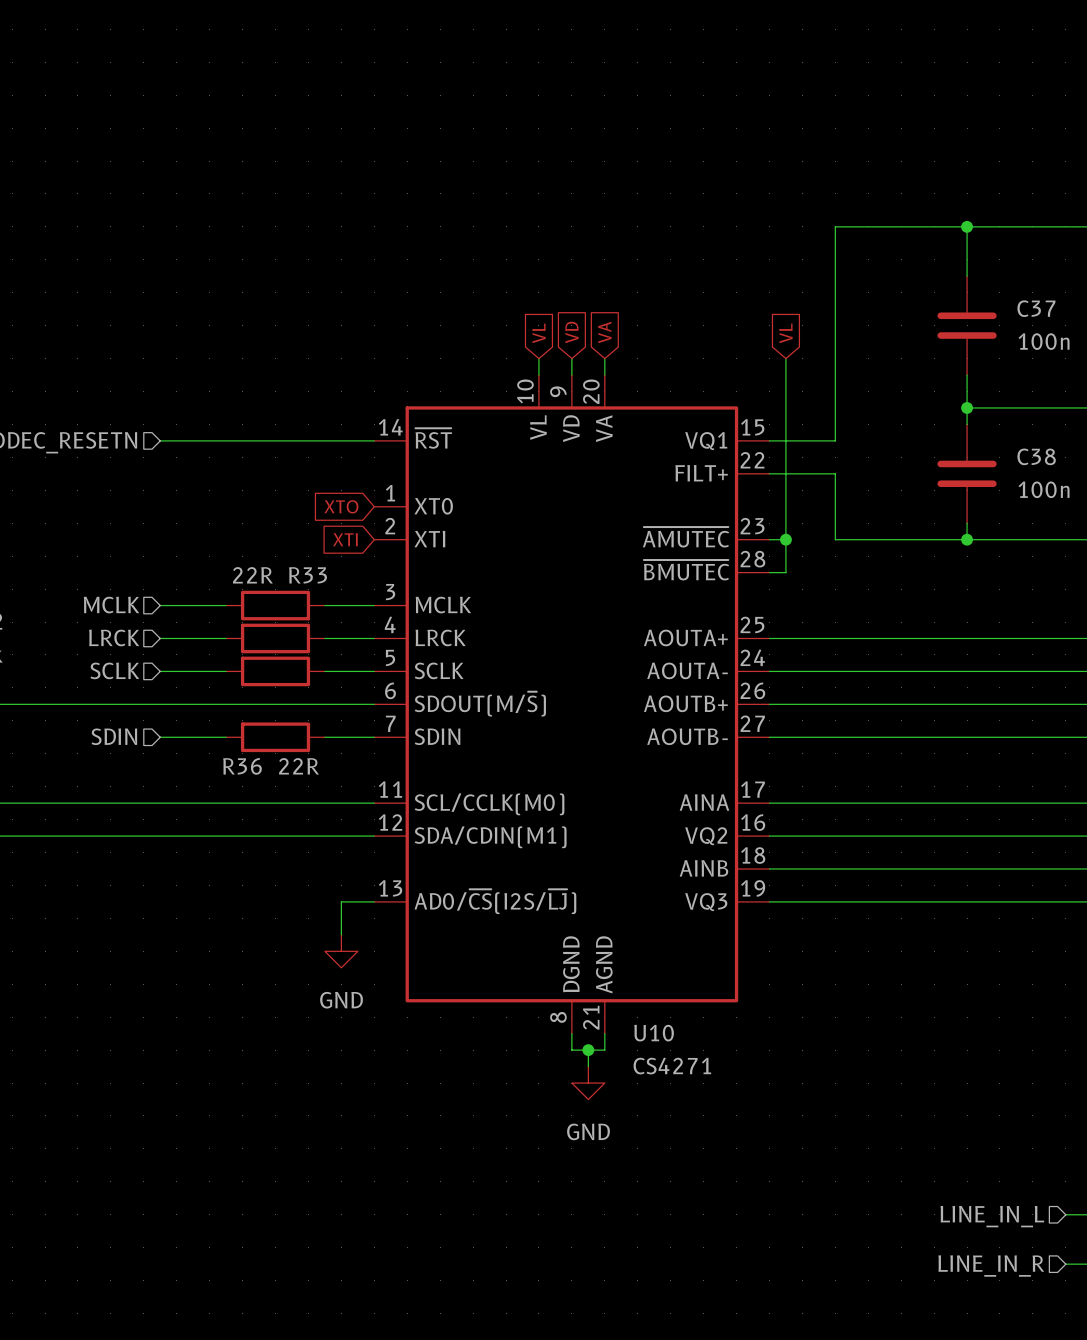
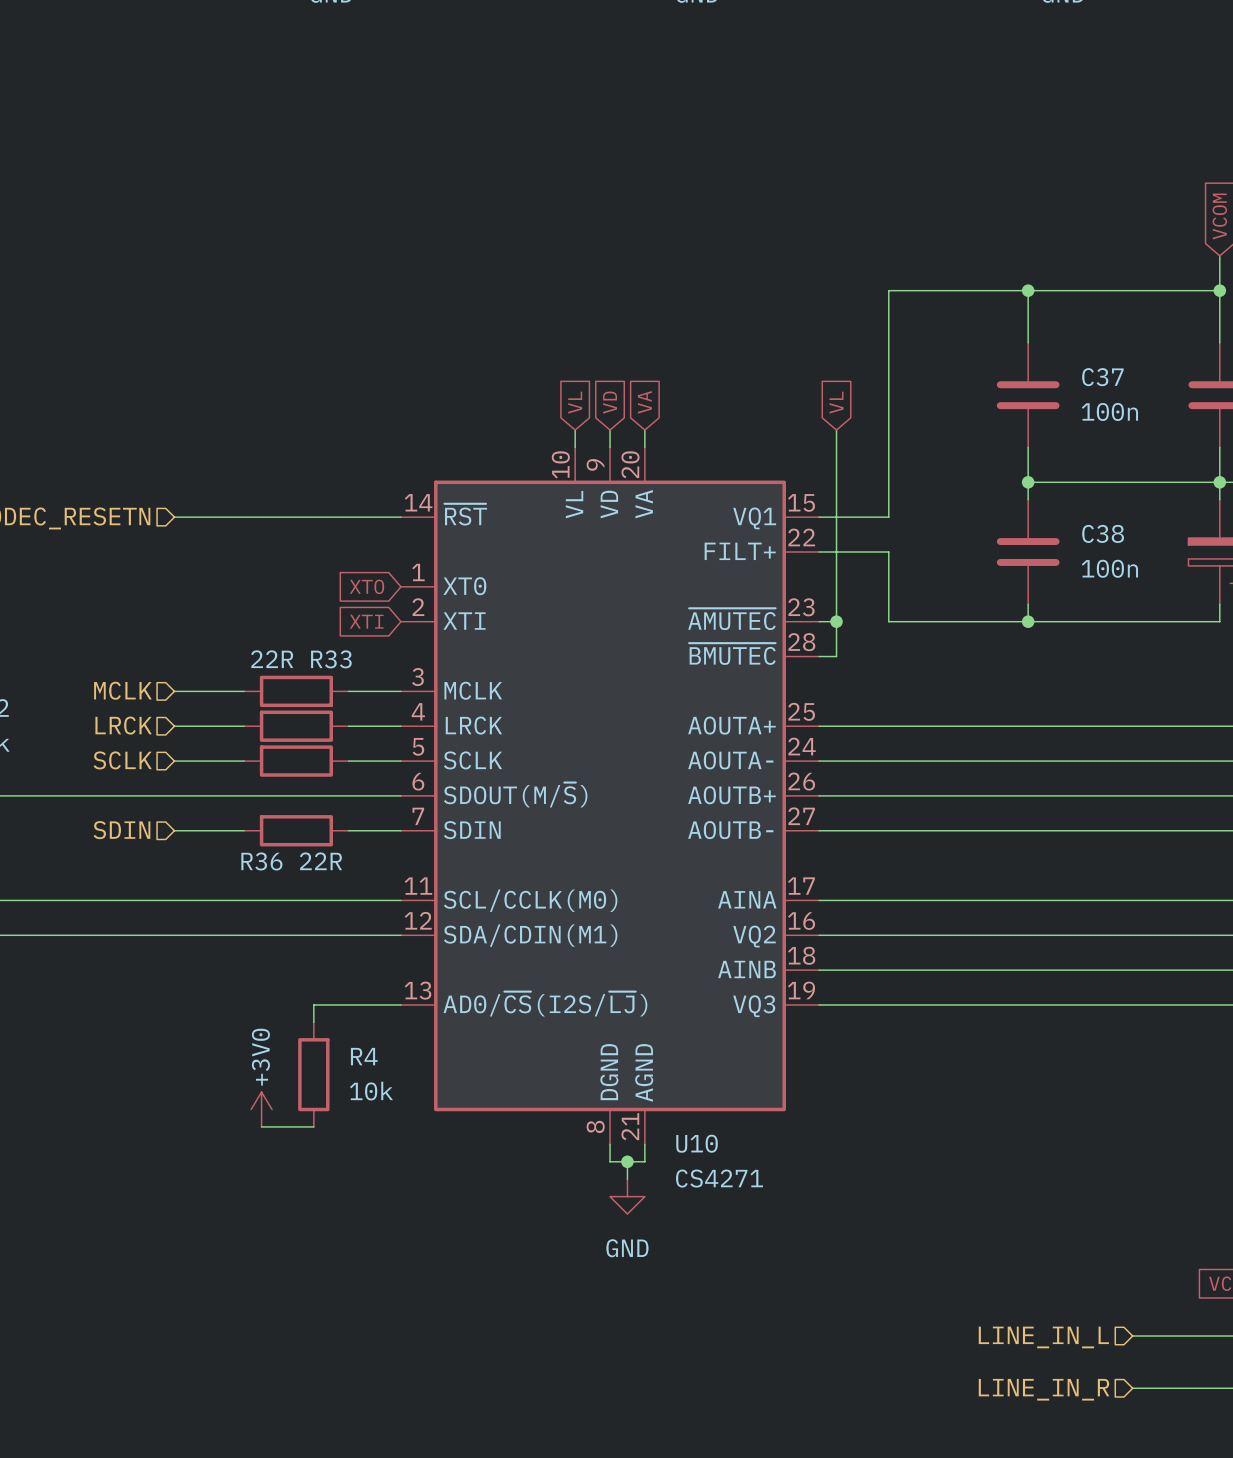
wire: (341, 901) (341, 934) -> (366, 1004) (313, 1004) (313, 1022)
power symbol: GND (341, 951) -> none
R4: none -> 10k (313, 1074)
power symbol: none -> +3V0 (261, 1109)
wire: none -> (261, 1126) (313, 1126)

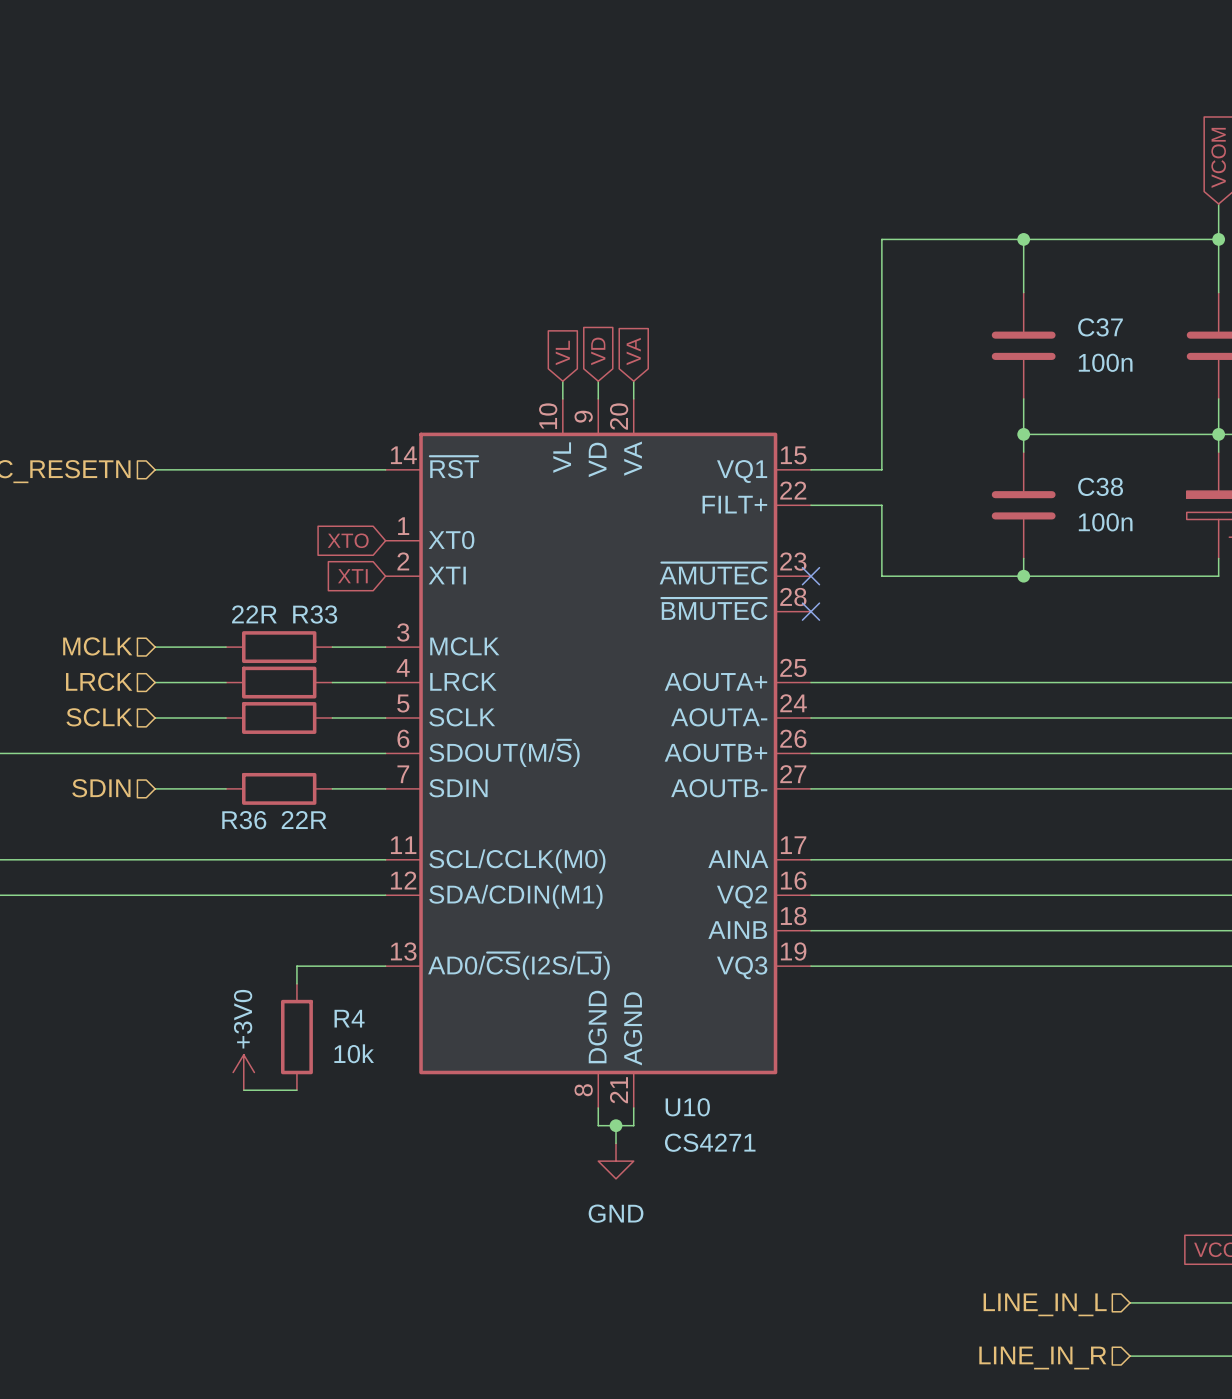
global label: VL (836, 402) -> none
wire: (836, 430) (836, 656) (819, 656) -> none
wire: (819, 621) (836, 621) -> none
no-connect mark: none -> (810, 576)
junction: (836, 621) -> none
no-connect mark: none -> (810, 611)

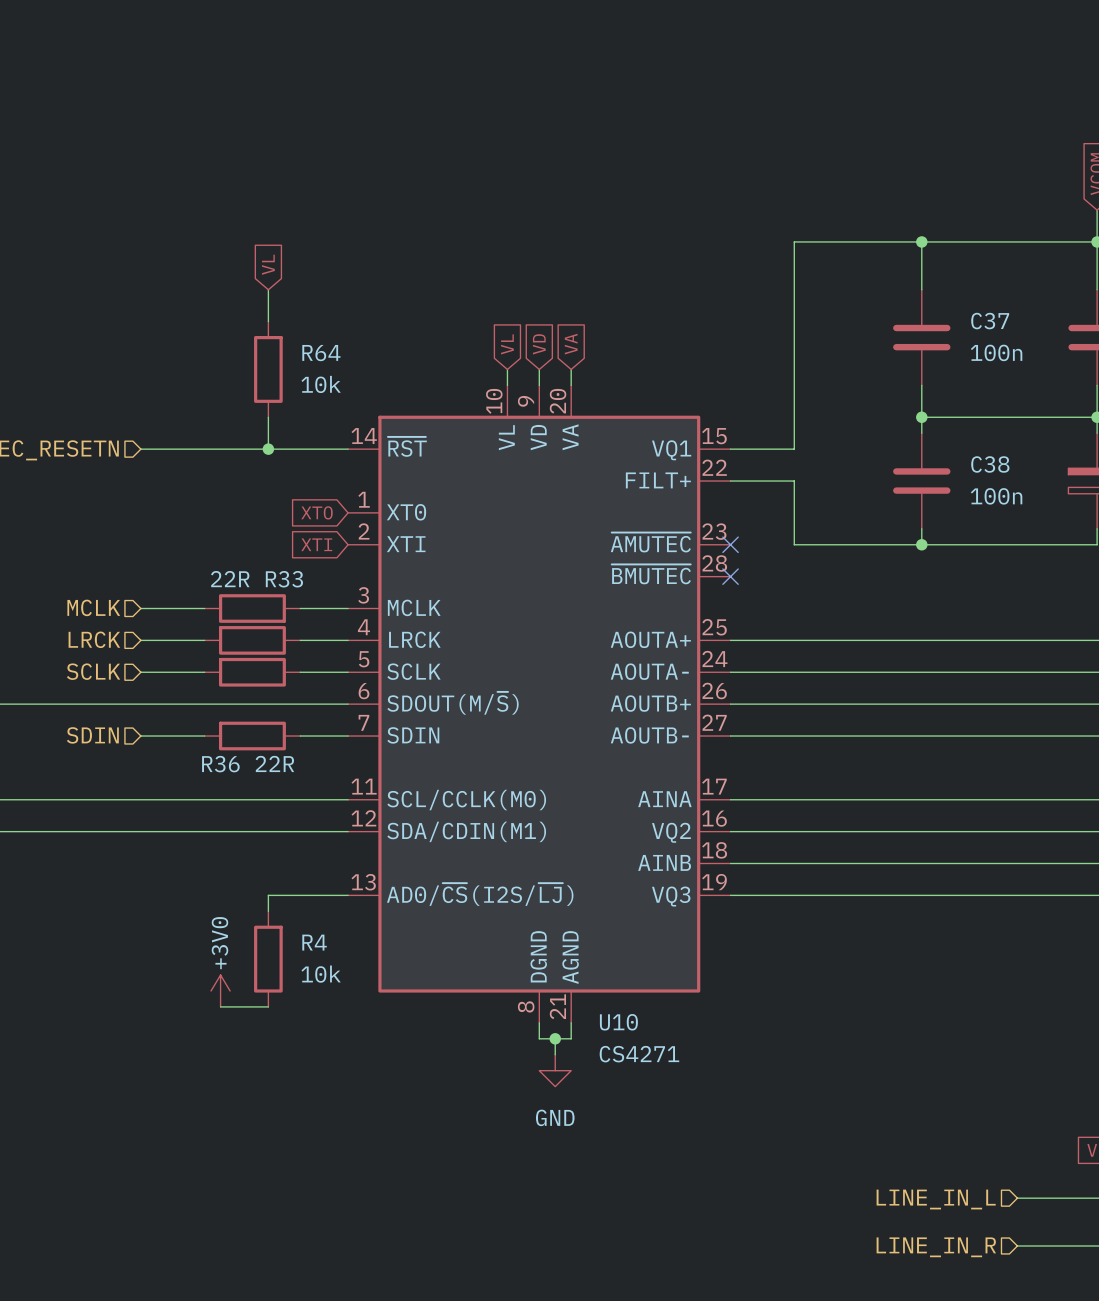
global label: none -> VL (268, 264)
wire: none -> (268, 289) (268, 321)
R64: none -> 10k (268, 369)
wire: none -> (268, 417) (268, 449)
junction: none -> (268, 449)

